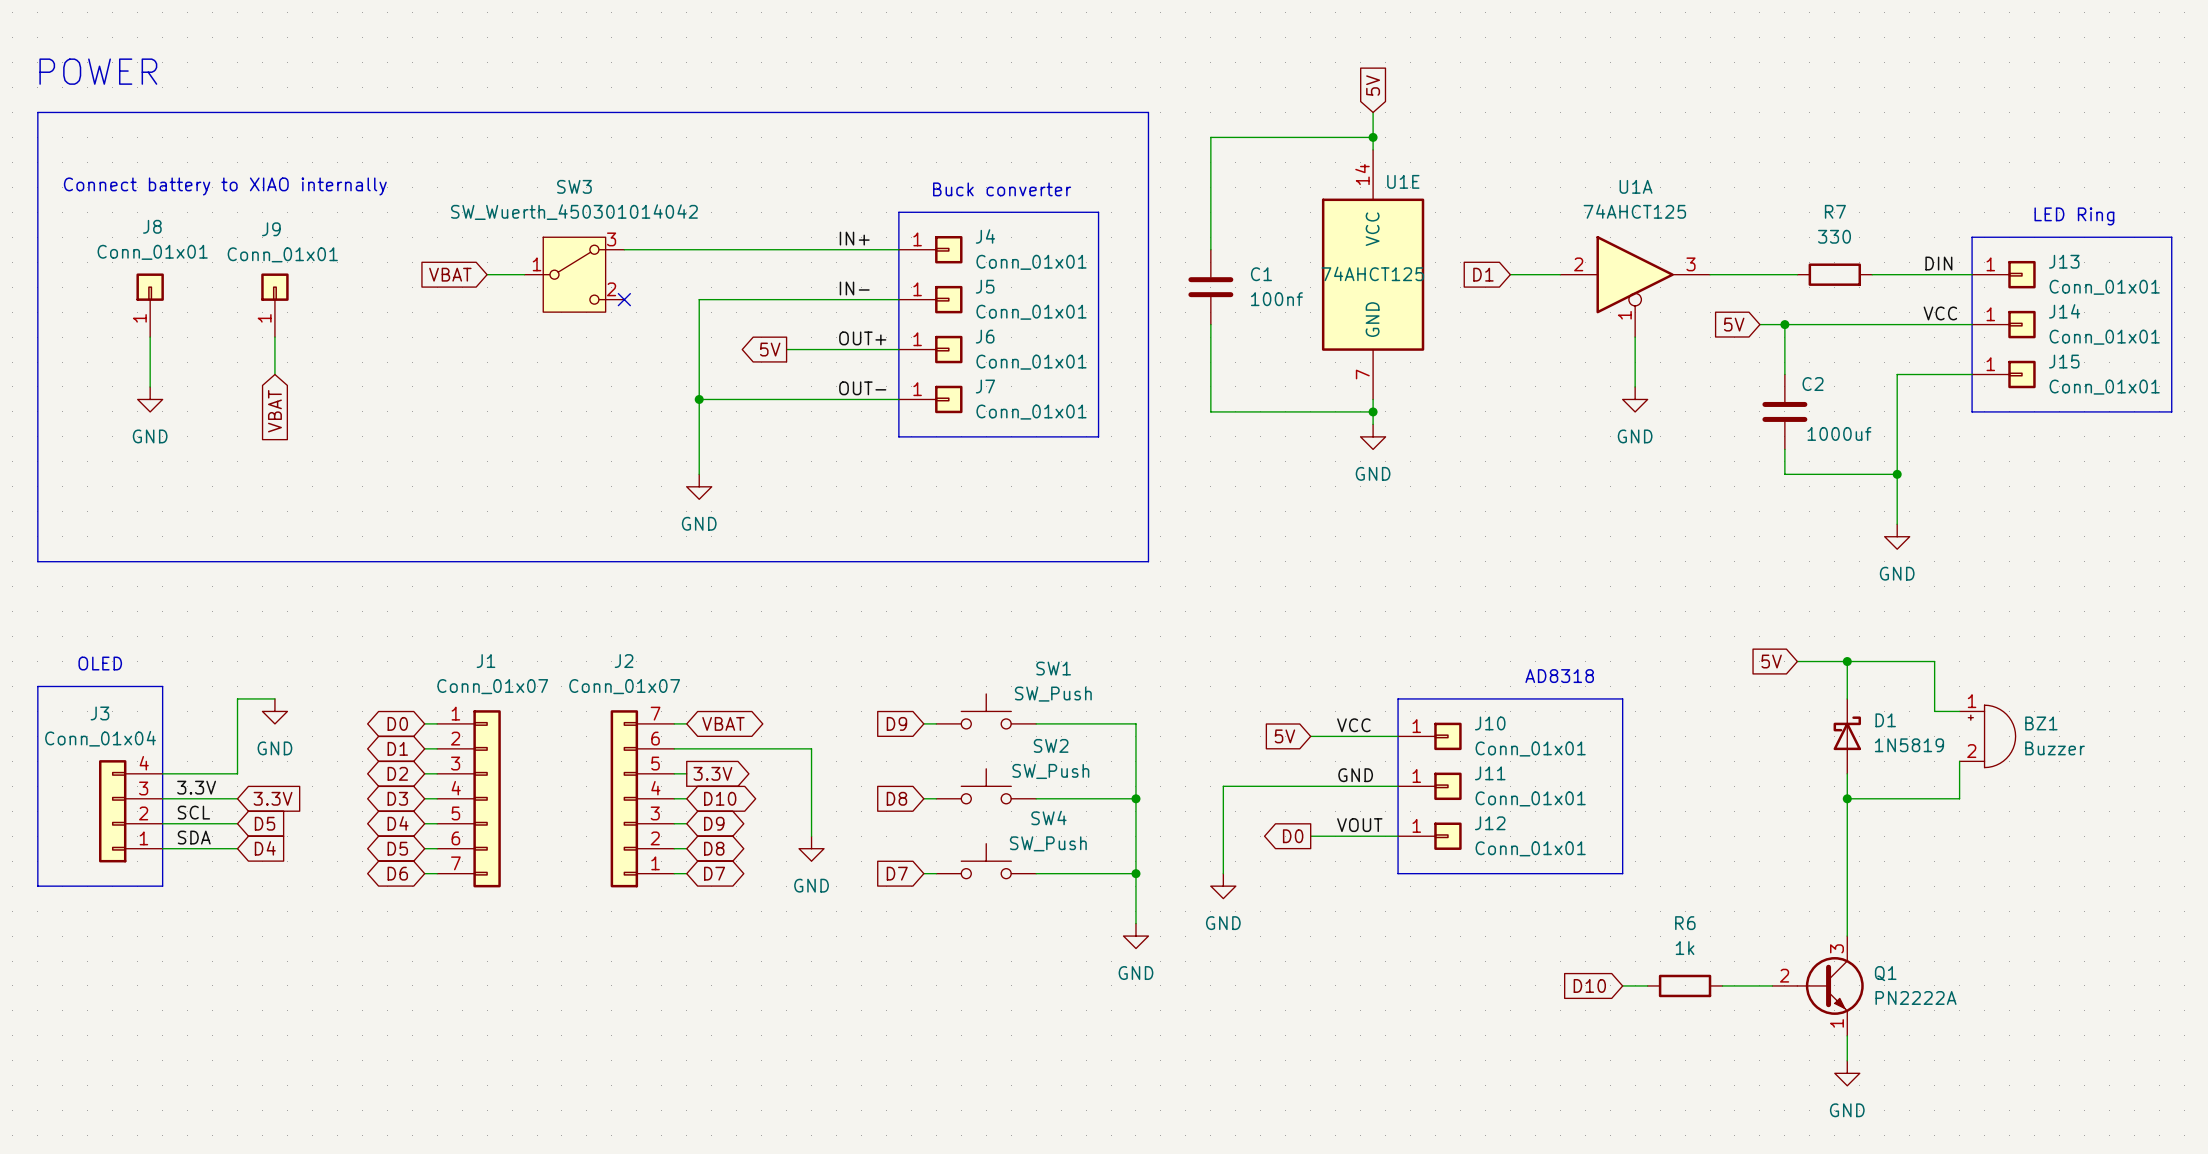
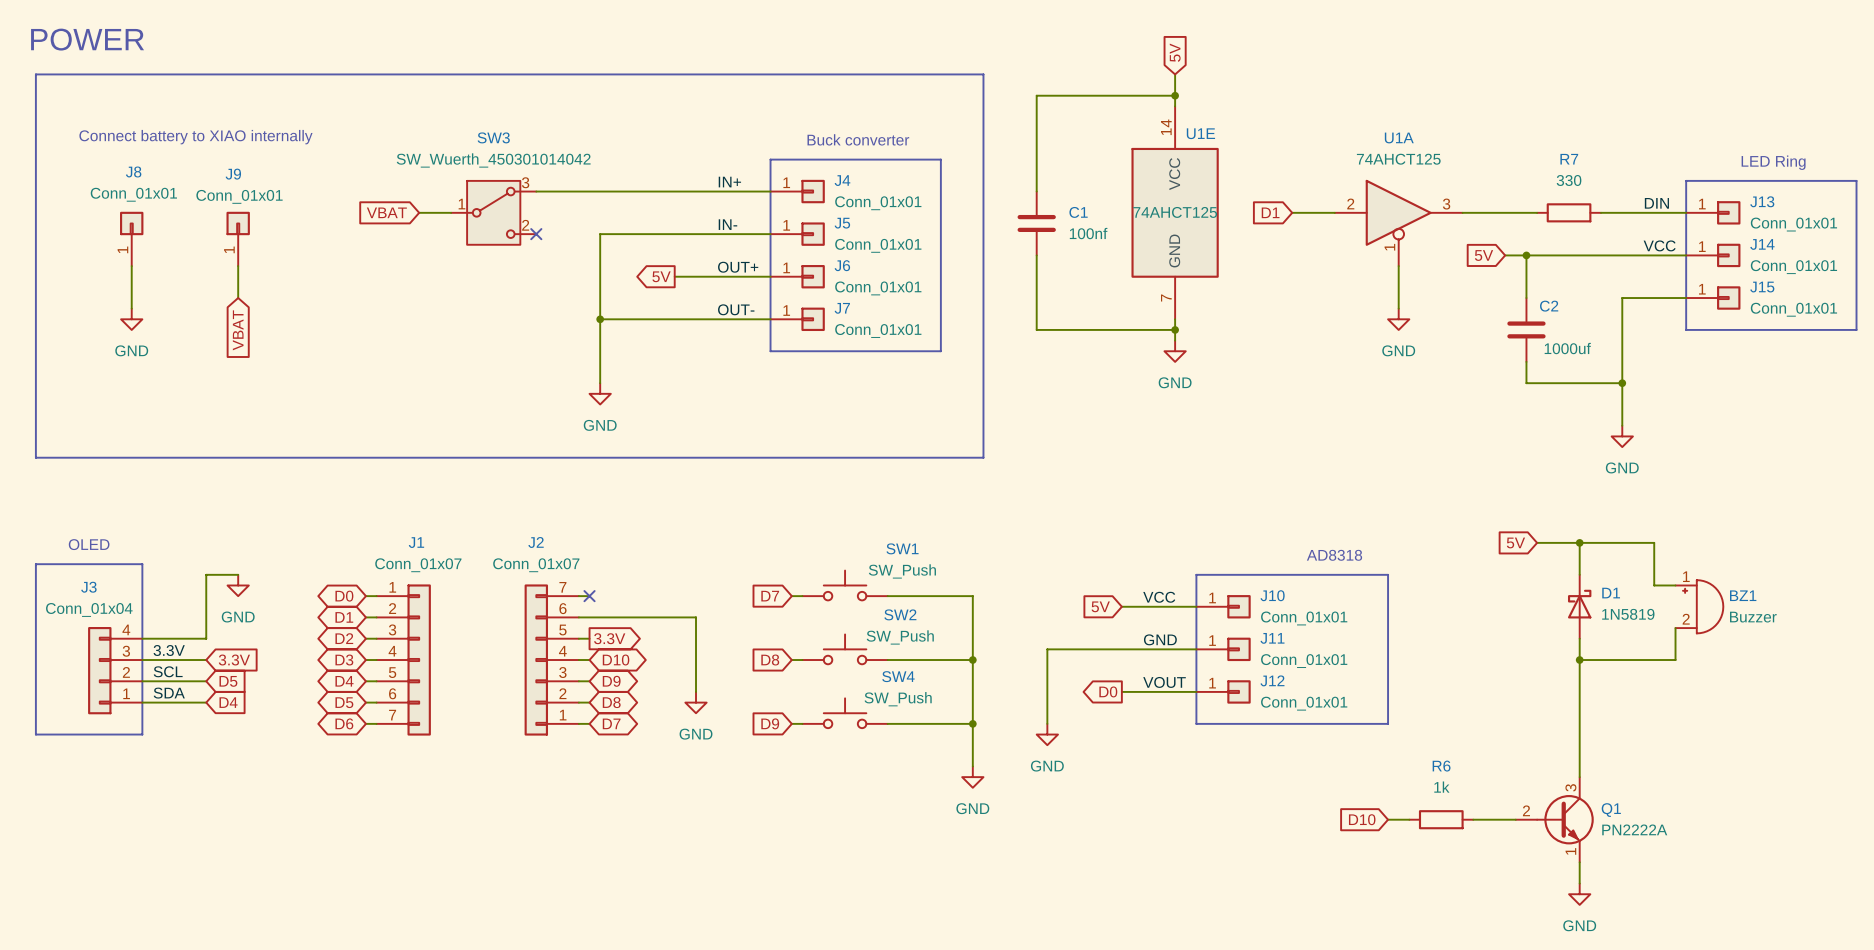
no-connect mark: none -> (589, 596)
global label: VBAT (723, 723) -> none
global label: D9 (896, 723) -> D7 (770, 596)
global label: D7 (897, 873) -> D9 (770, 723)

